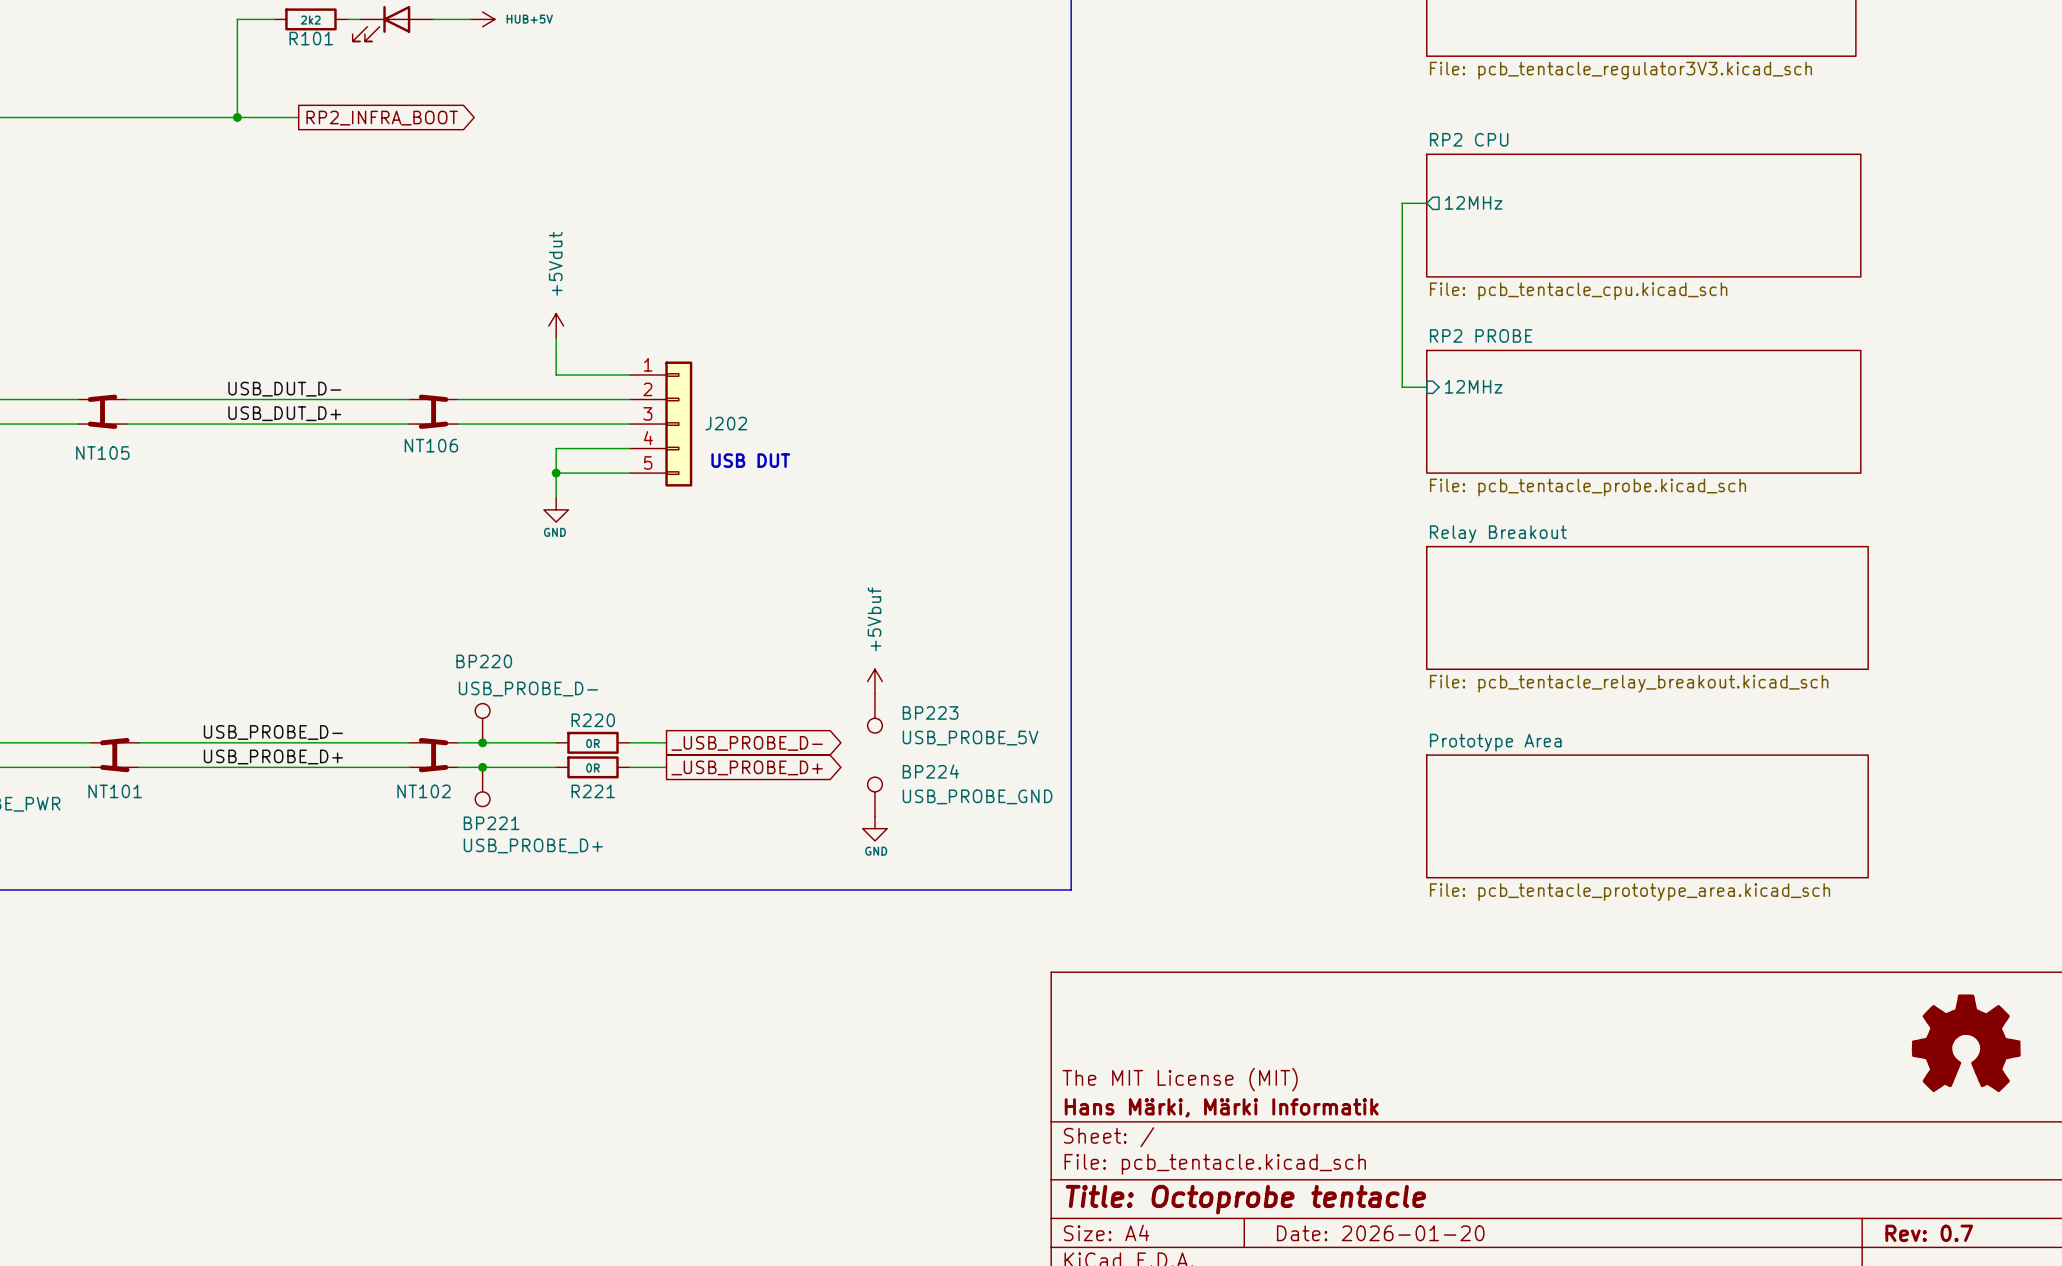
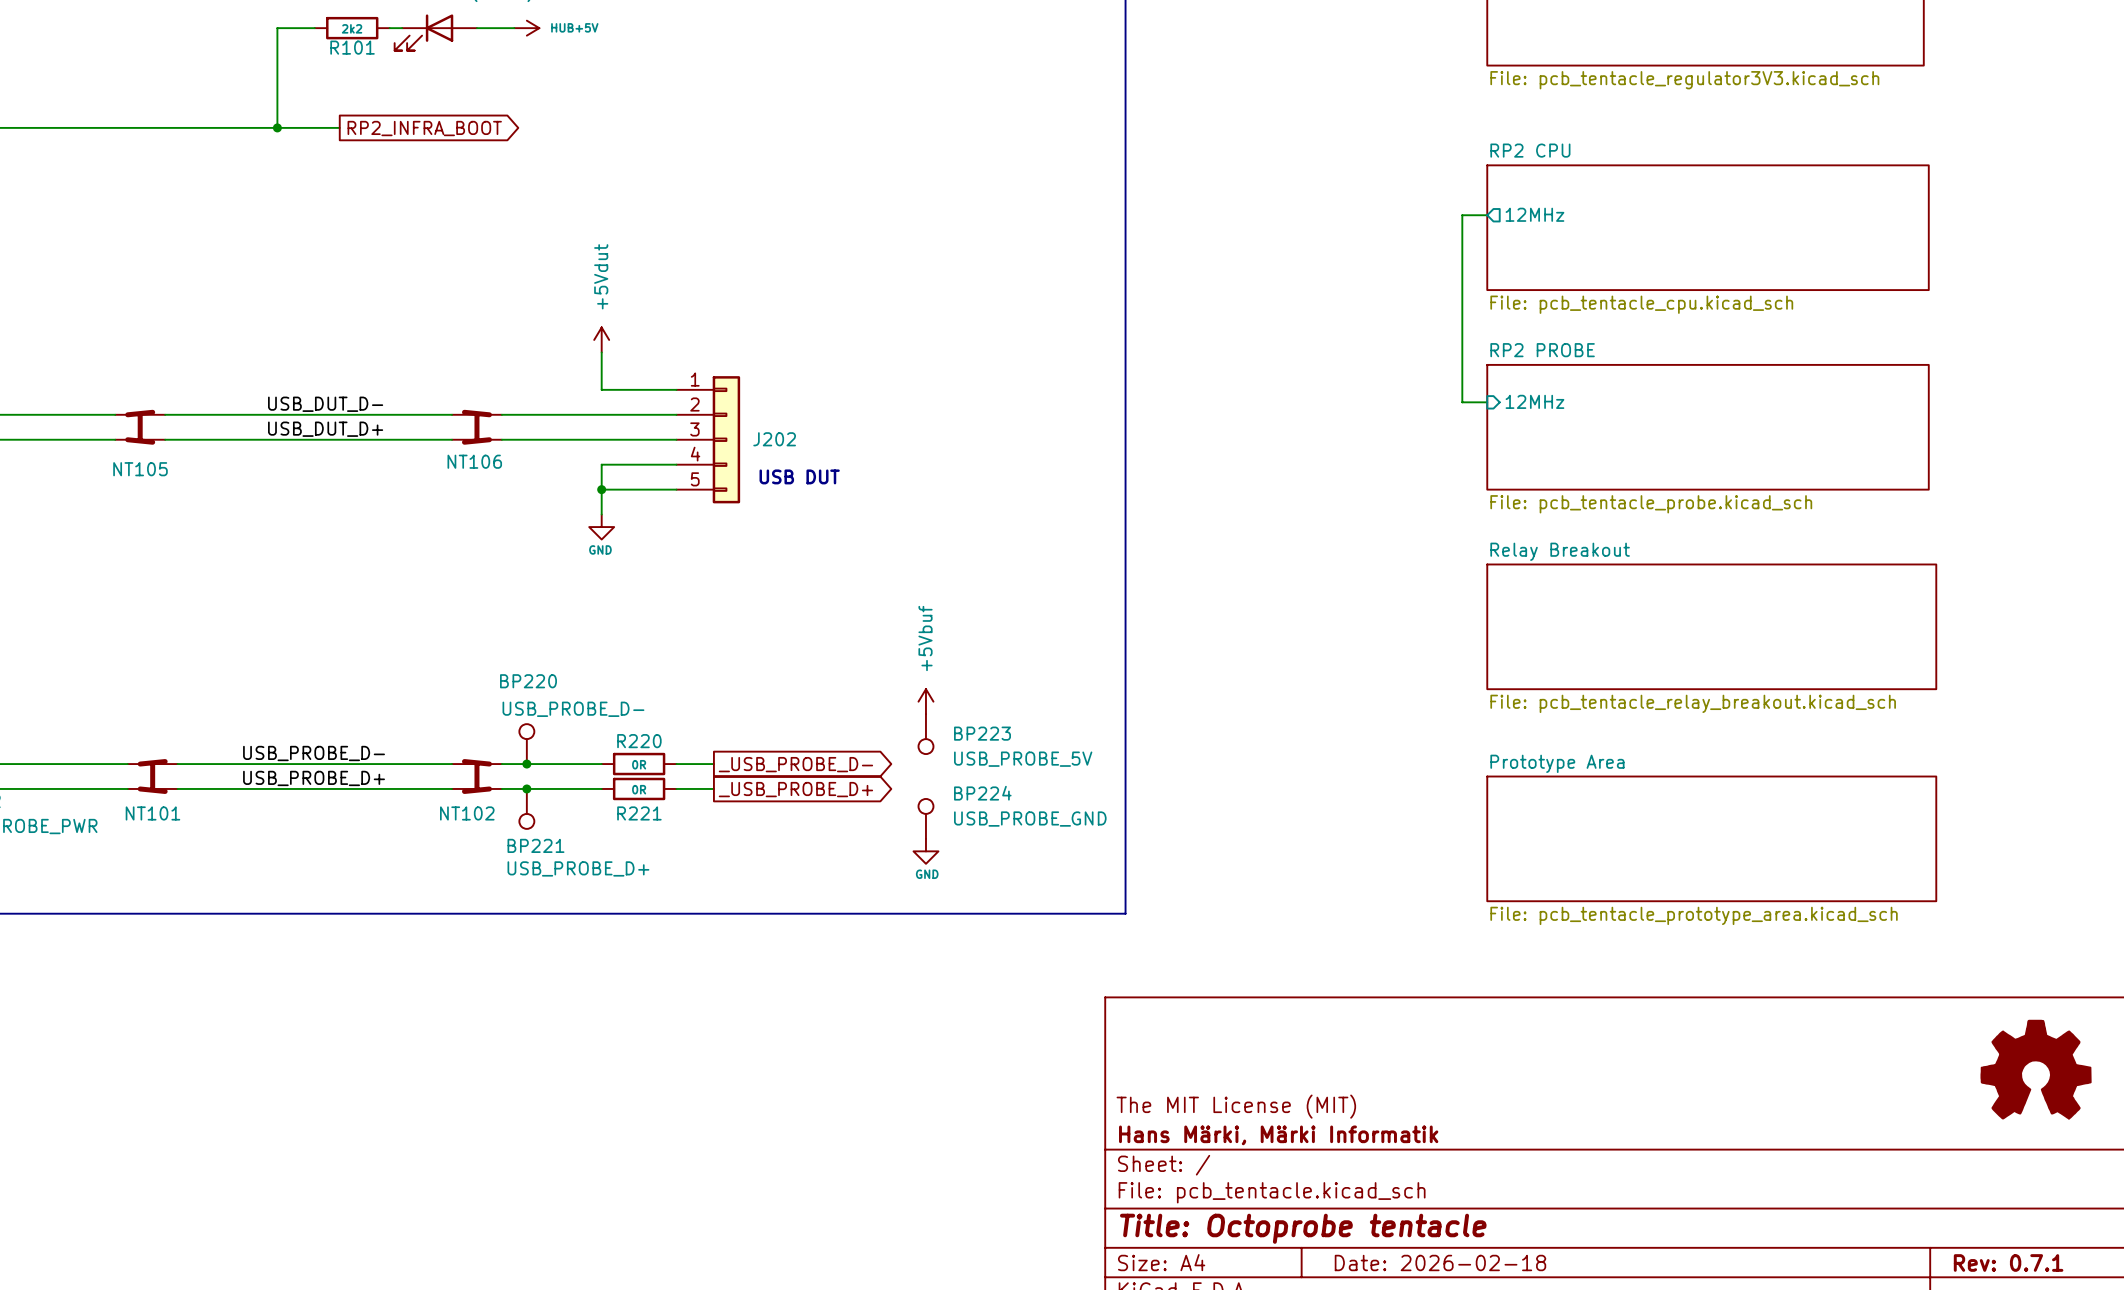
title block: Date: 2026-01-20 (1380, 1233) -> Date: 2026-02-18 (1440, 1262)
title block: Rev: 0.7 (1929, 1233) -> Rev: 0.7.1 (2008, 1262)

